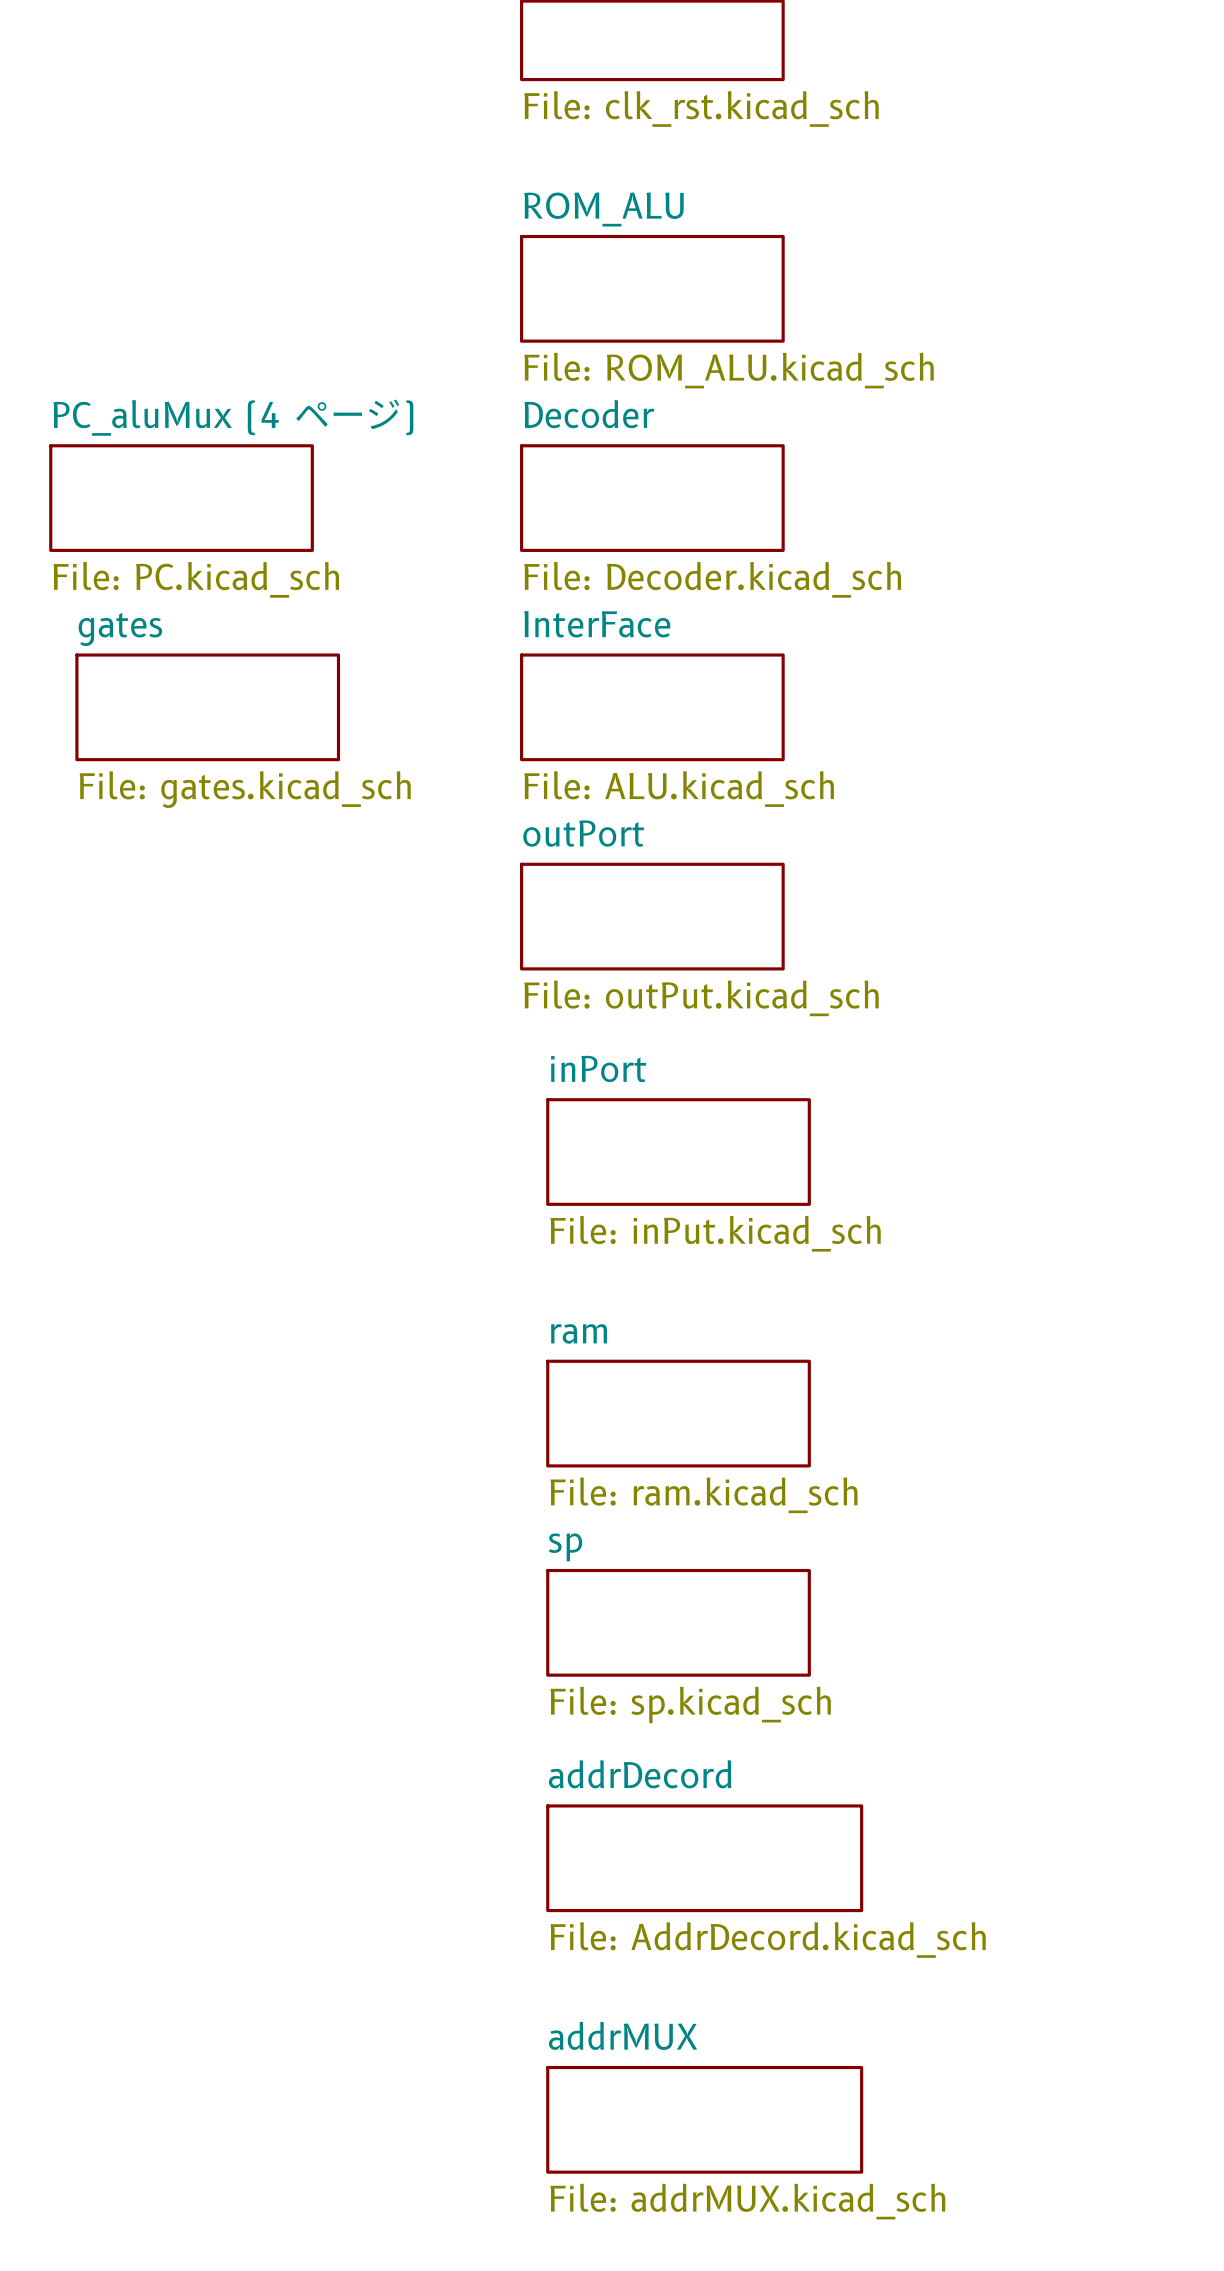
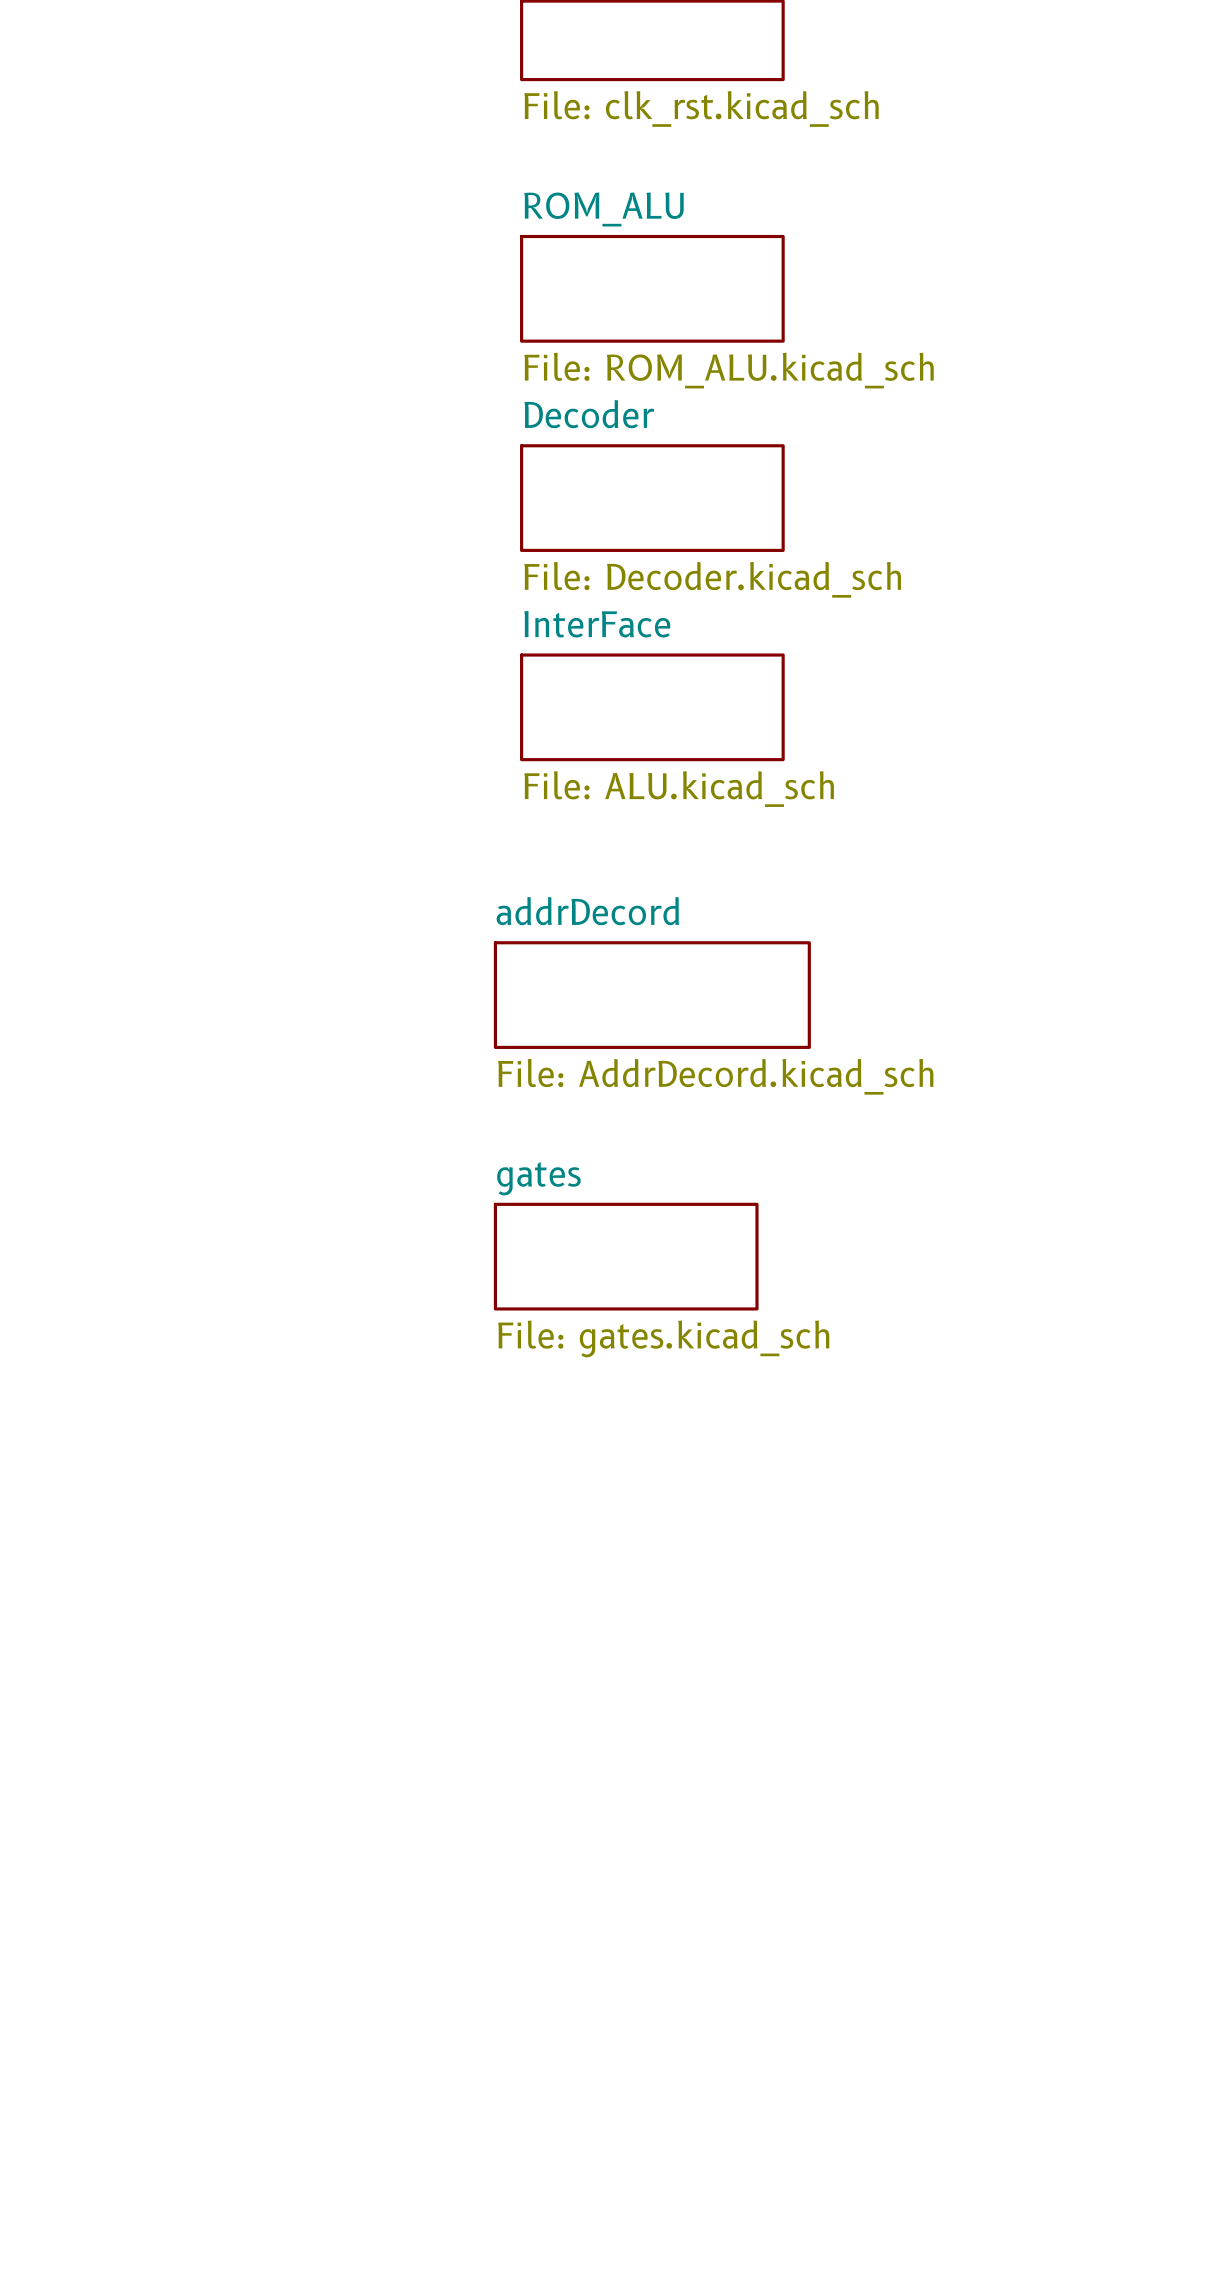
sheet PC_aluMux (4 ページ): File: PC.kicad_sch (181, 498) -> none
sheet gates: File: gates.kicad_sch (207, 707) -> none
sheet outPort: File: outPut.kicad_sch (652, 916) -> none
sheet addrDecord: none -> File: AddrDecord.kicad_sch (652, 995)
sheet inPort: File: inPut.kicad_sch (678, 1152) -> none
sheet gates: none -> File: gates.kicad_sch (626, 1256)
sheet ram: File: ram.kicad_sch (678, 1413) -> none
sheet sp: File: sp.kicad_sch (678, 1622) -> none
sheet addrDecord: File: AddrDecord.kicad_sch (704, 1858) -> none
sheet addrMUX: File: addrMUX.kicad_sch (704, 2119) -> none

